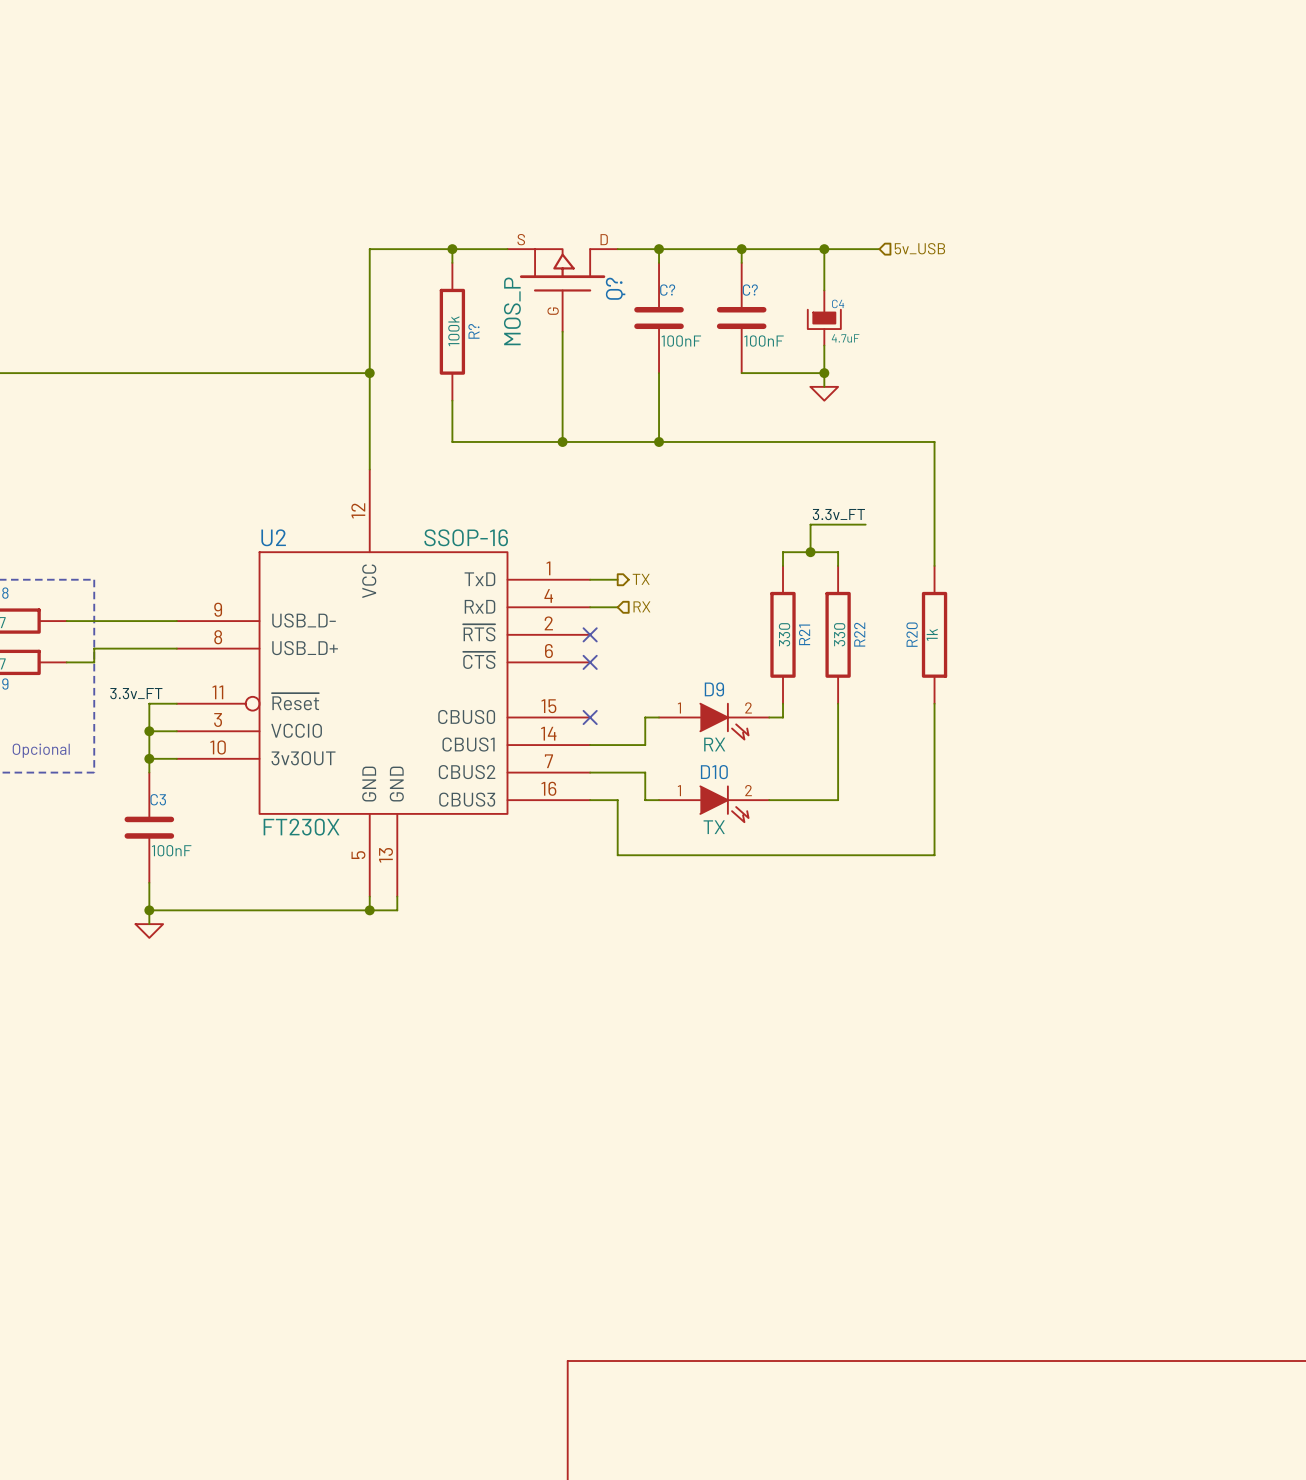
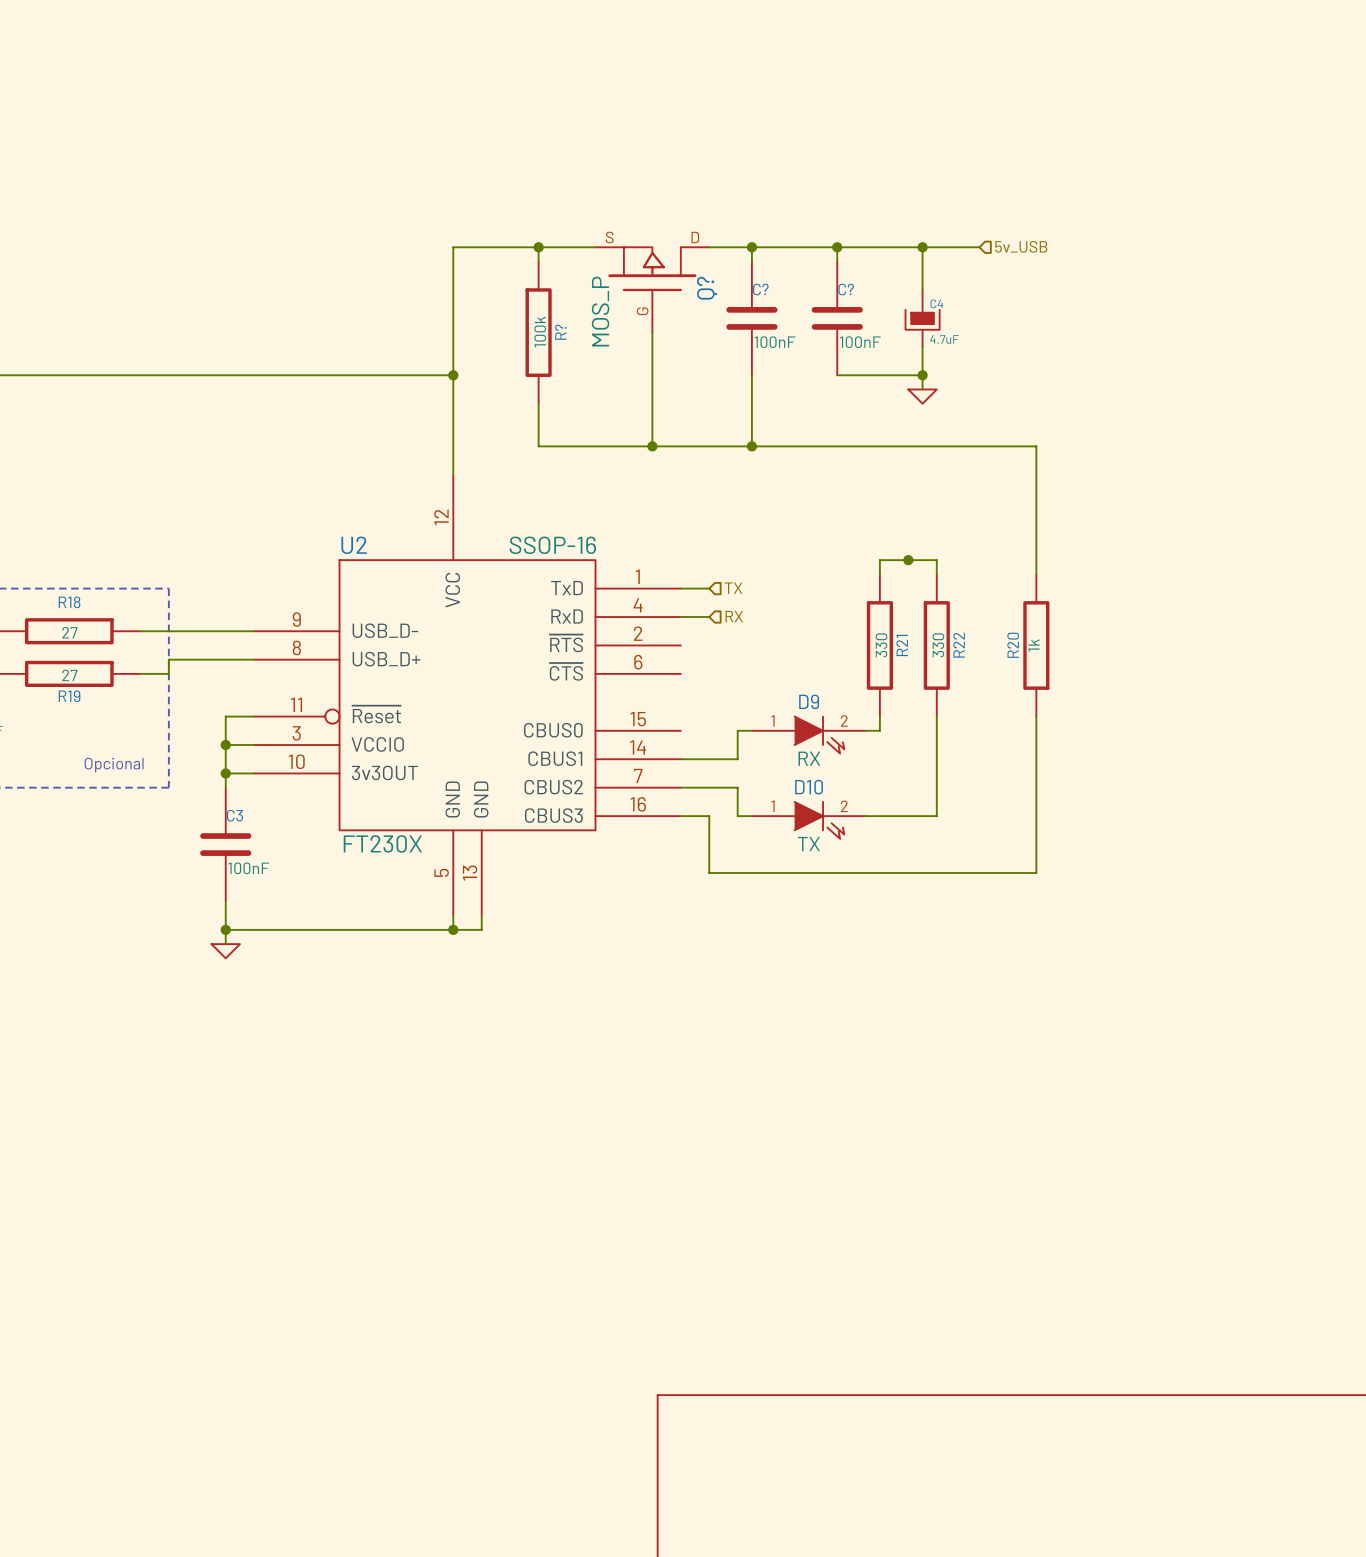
label: 3.3v_FT (838, 514) -> none
wire: (865, 524) (810, 524) (810, 552) -> none
hierarchical label shape: output (641, 579) -> input (733, 588)
no-connect mark: (590, 634) -> none
no-connect mark: (590, 662) -> none
label: 3.3v_FT (136, 693) -> none
no-connect mark: (590, 717) -> none

